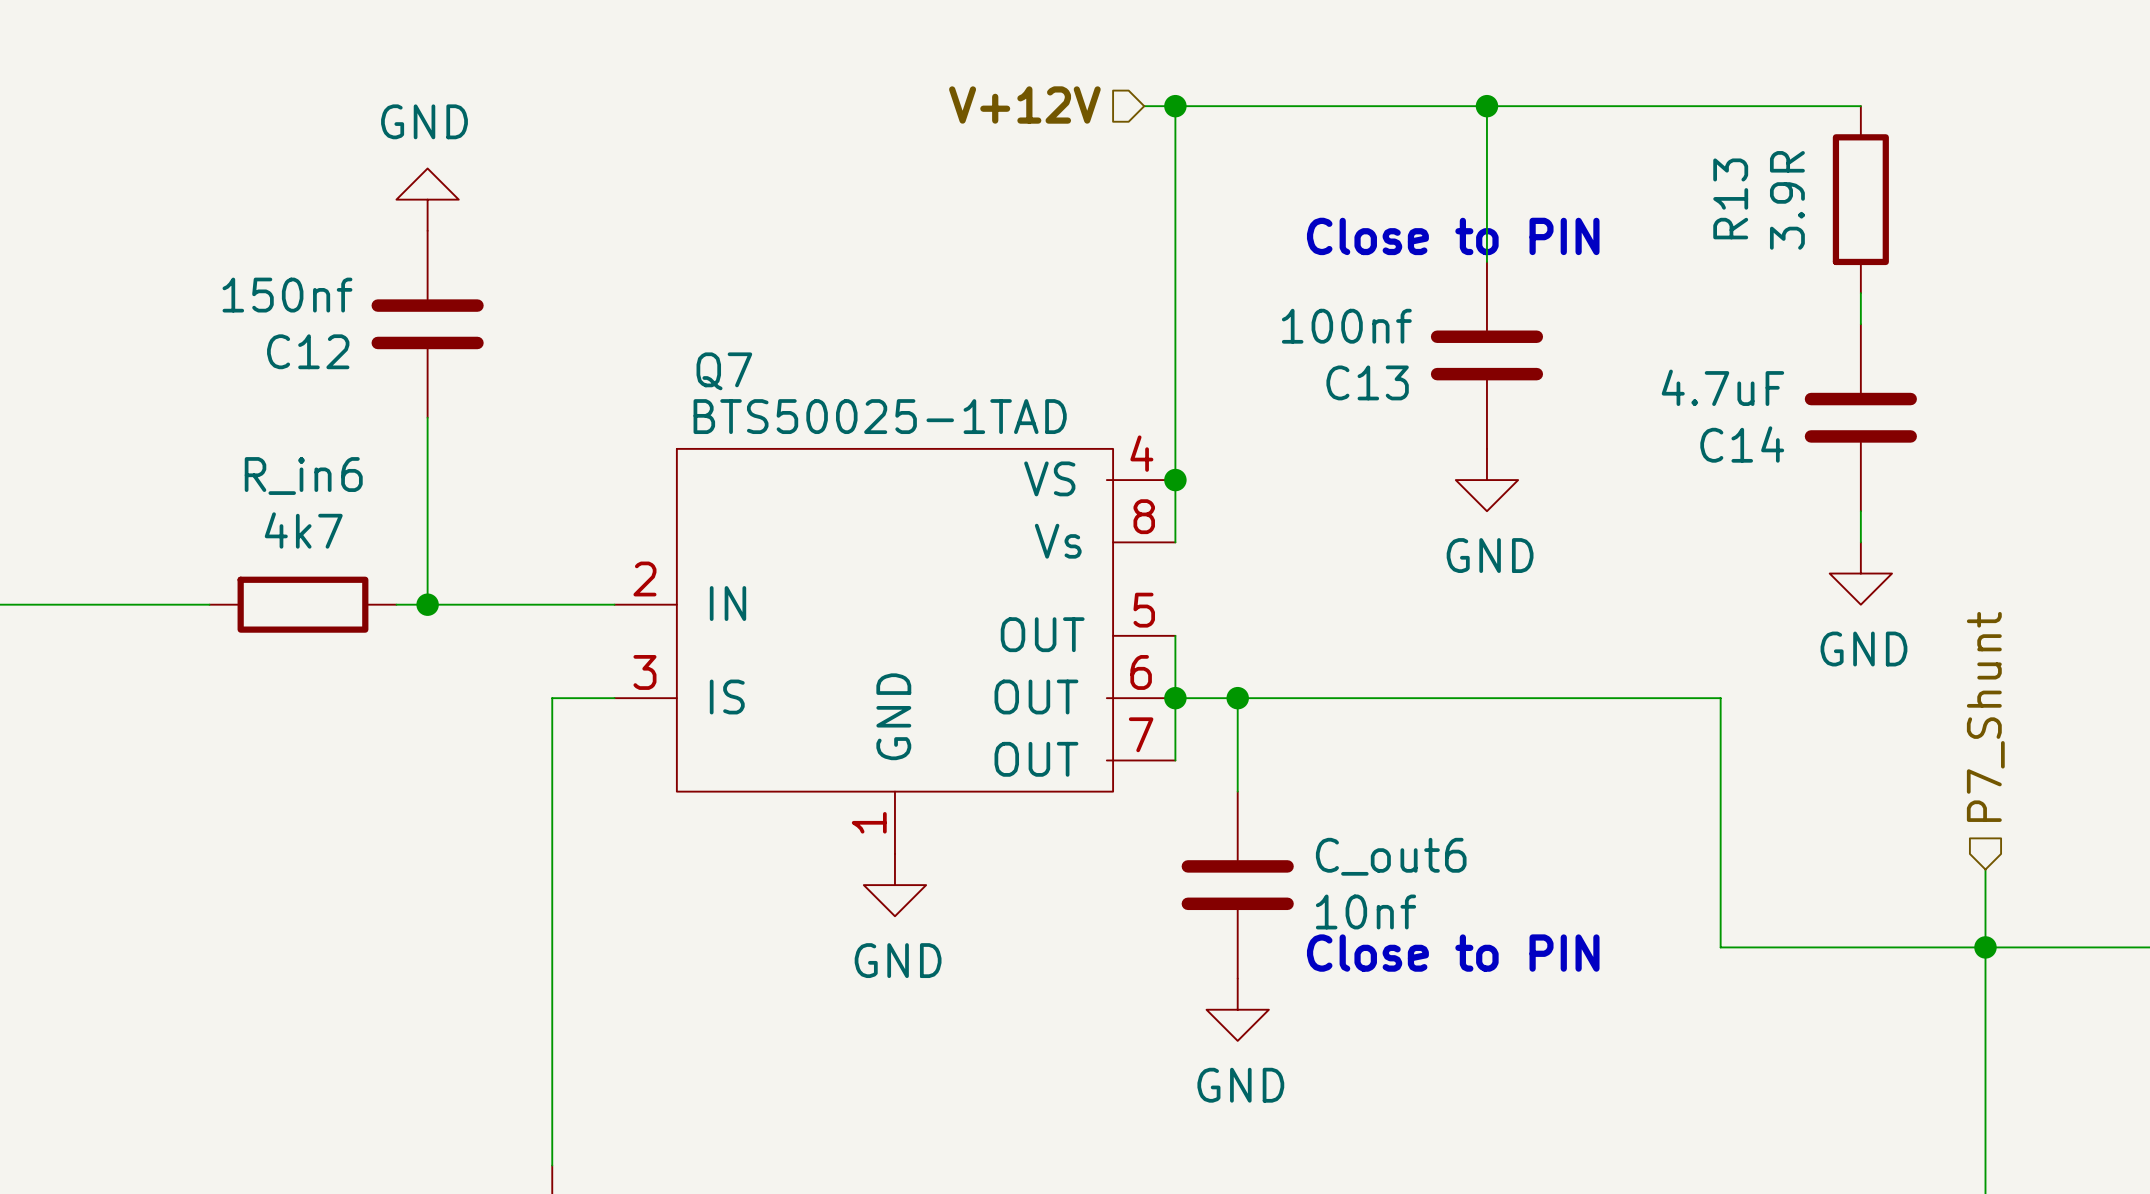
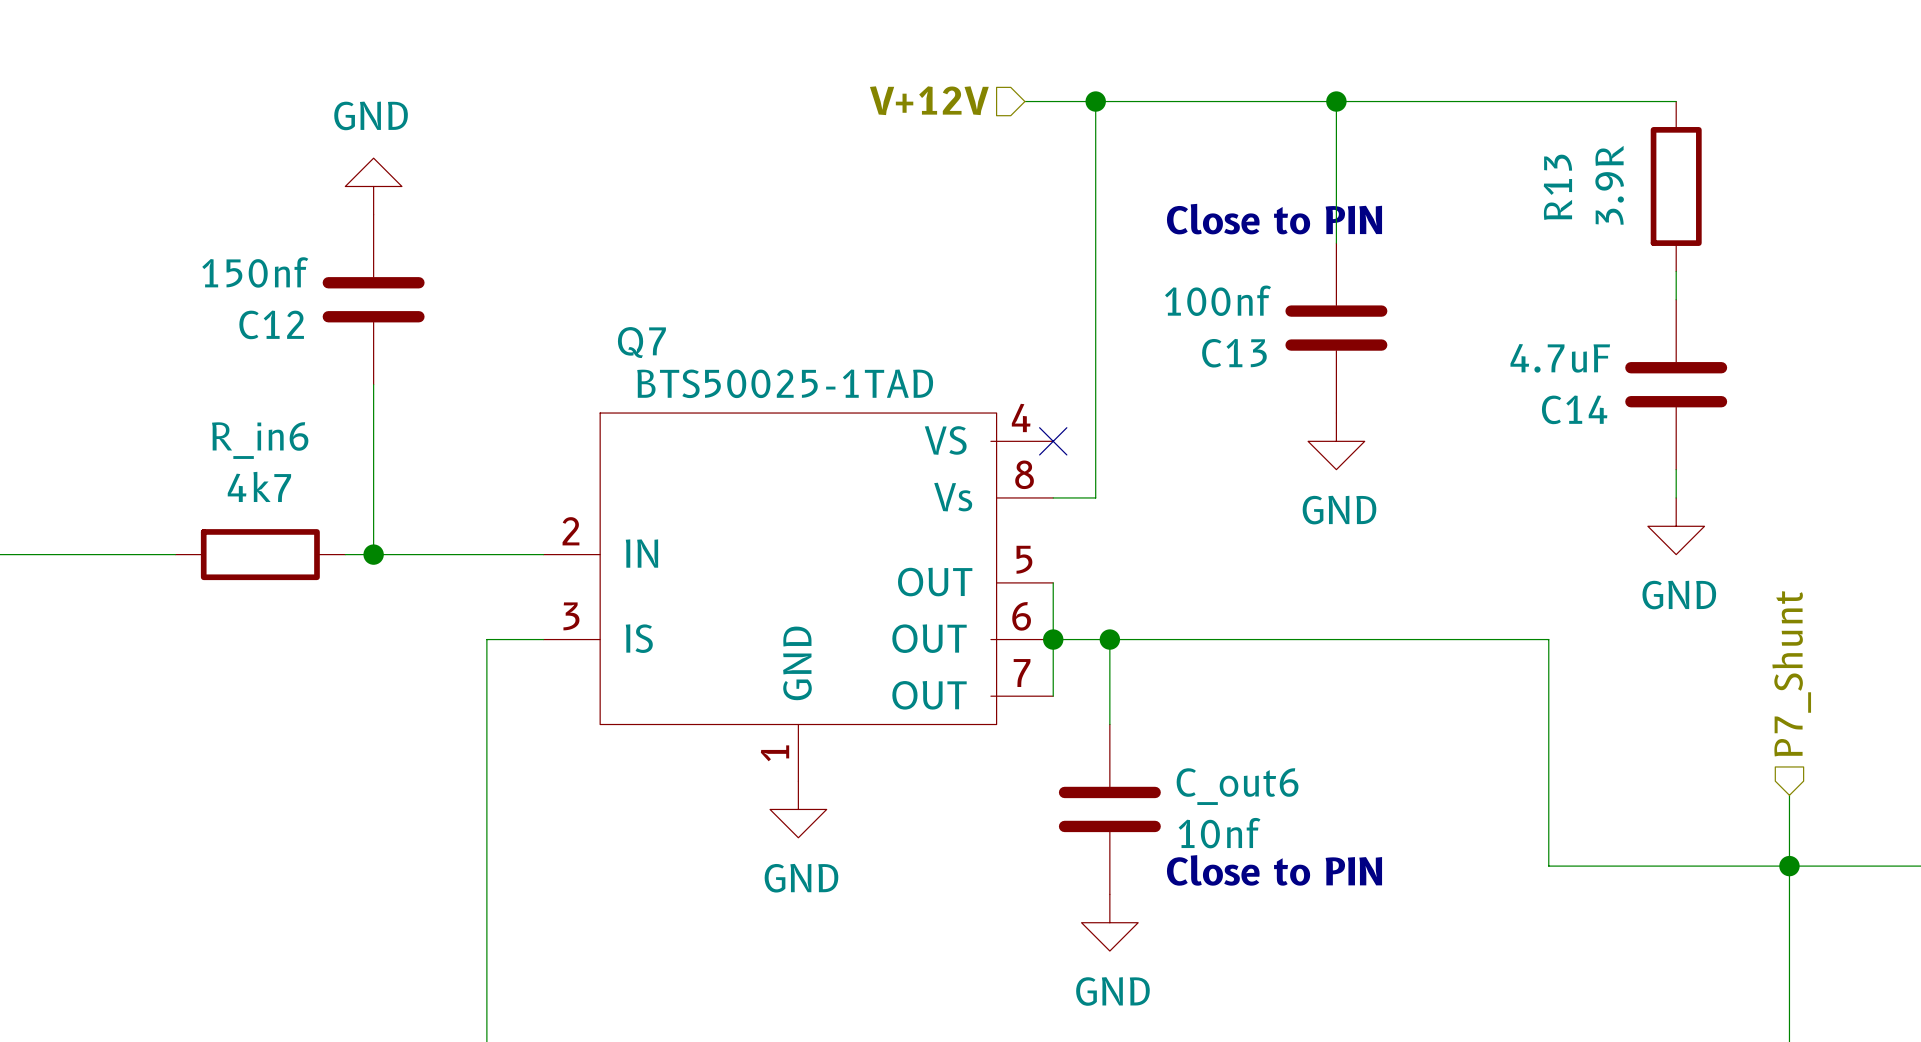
wire: (1175, 106) (1175, 542) -> (1095, 101) (1095, 497) (1053, 497)
junction position: (1175, 106) -> (1095, 101)
junction: (1175, 480) -> none
no-connect mark: none -> (1053, 441)

